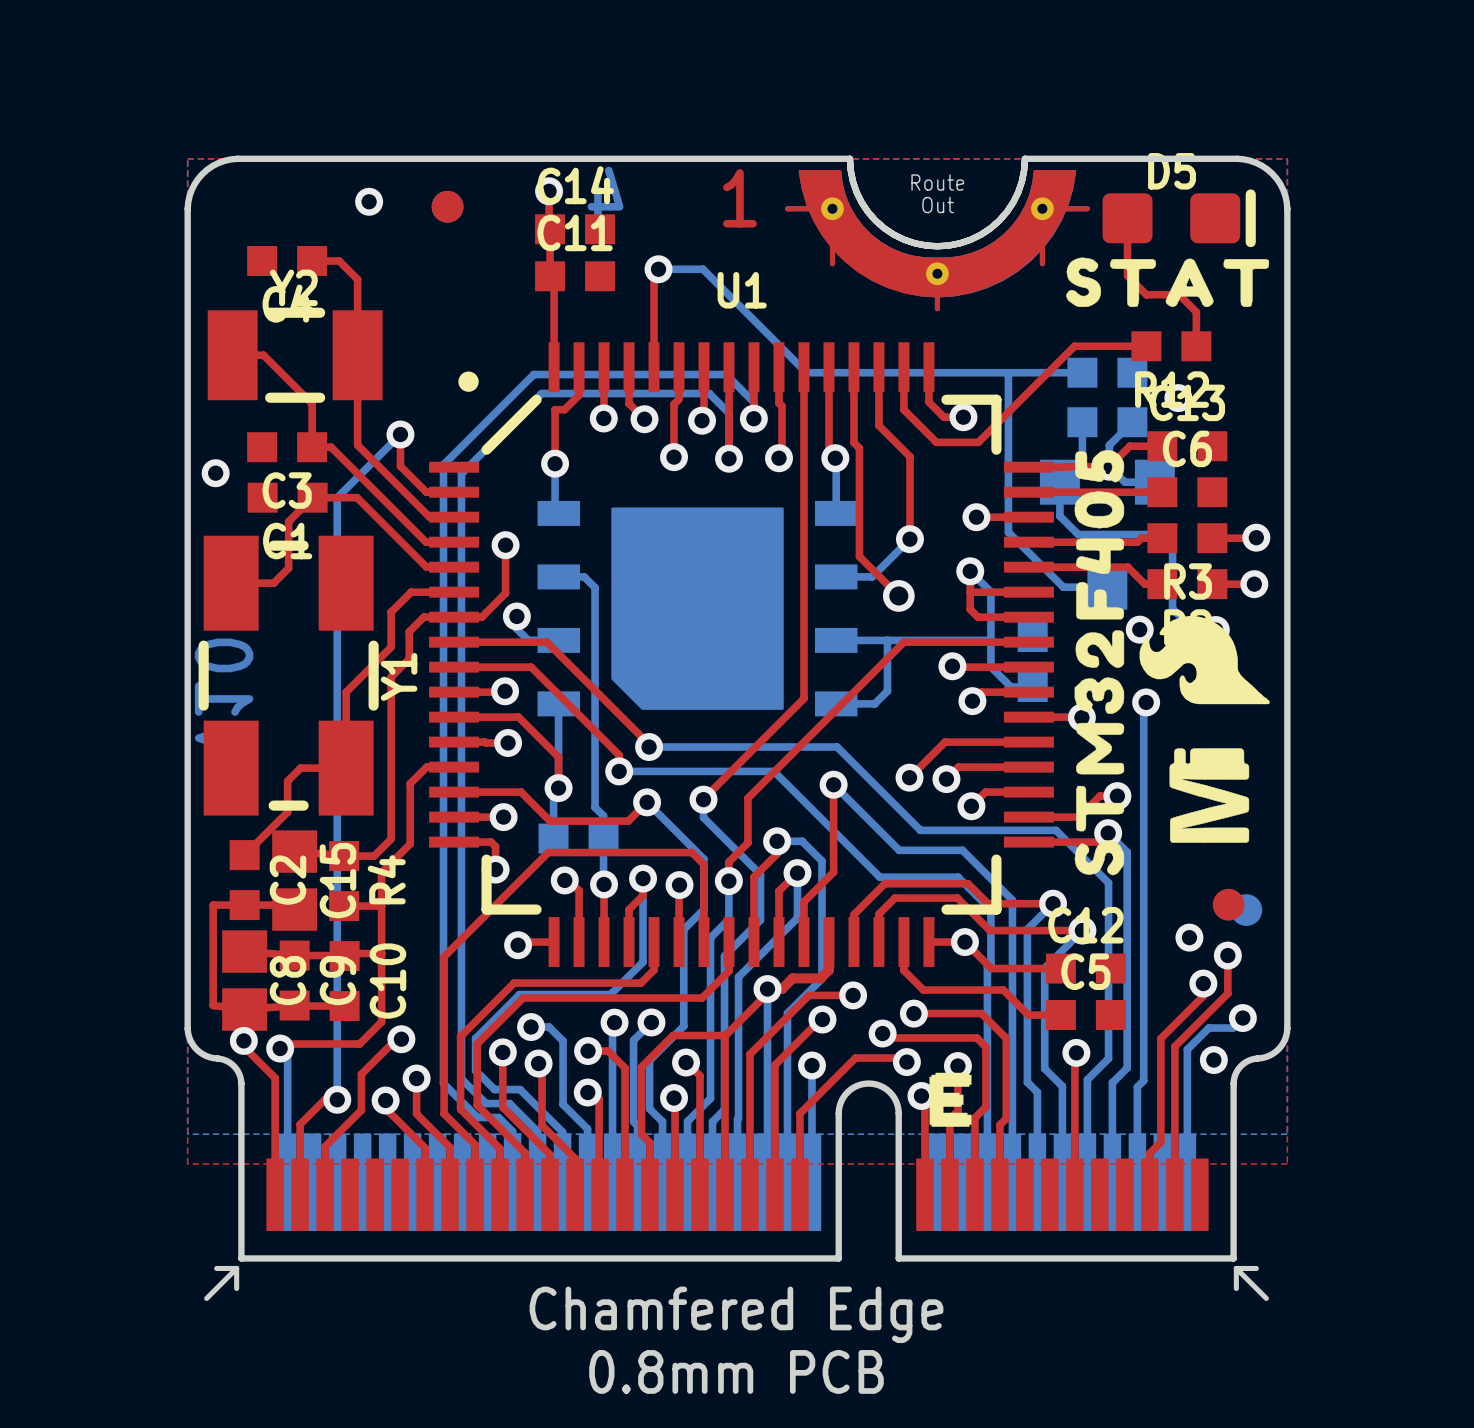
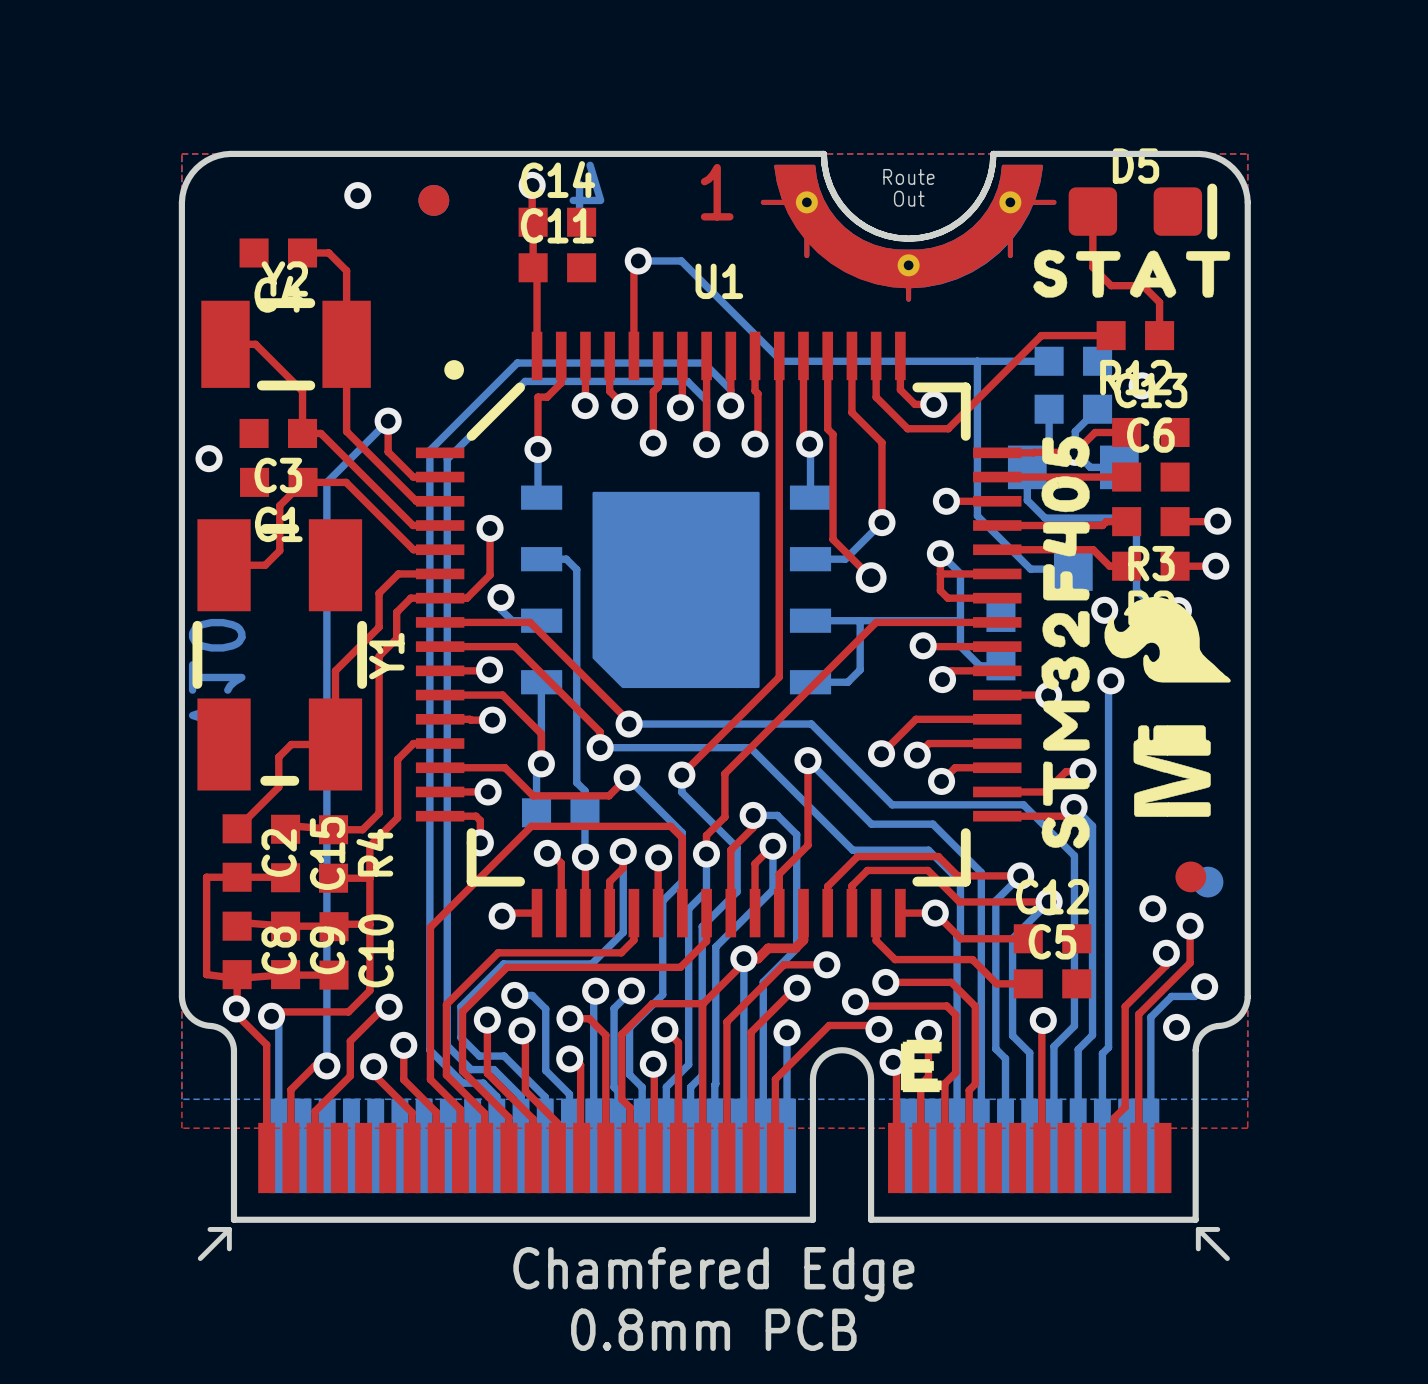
C15 footprint: [272, 830, 318, 931] -> [271, 814, 301, 893]
C8 footprint: [222, 930, 268, 1031] -> [222, 911, 252, 990]

